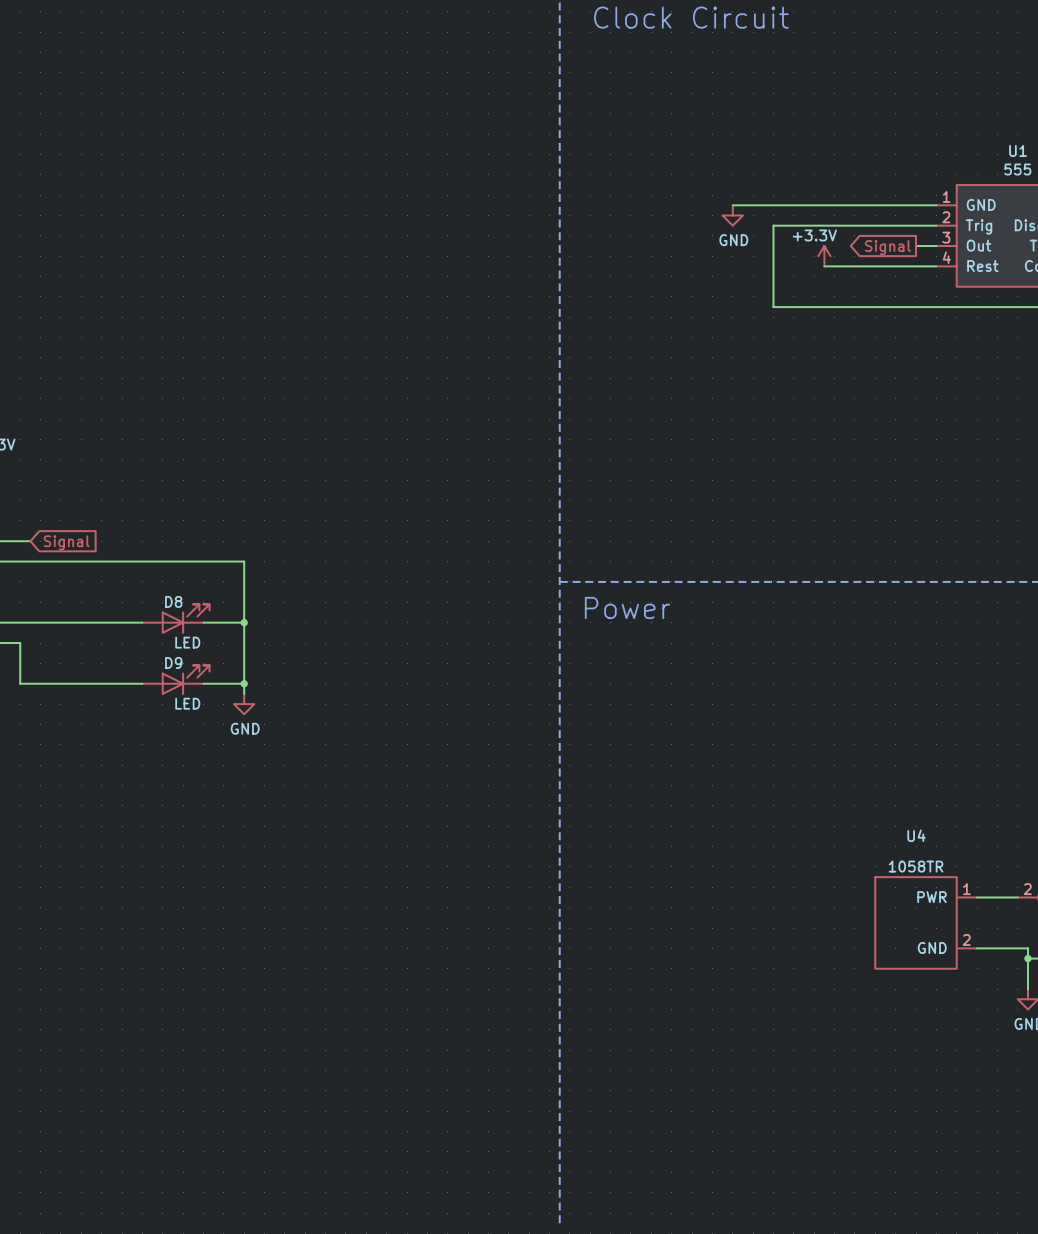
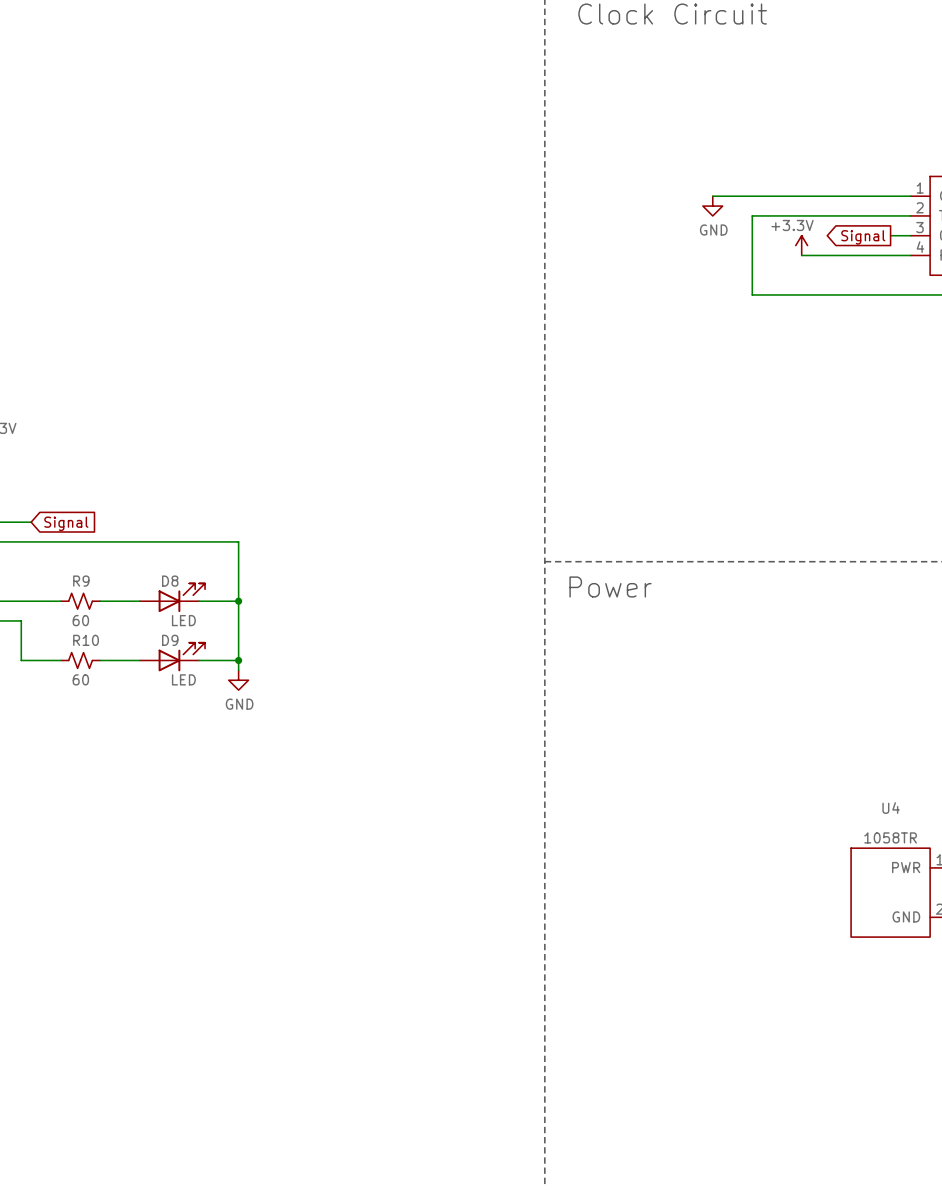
R9: none -> 60 (80, 601)
R10: none -> 60 (80, 660)

